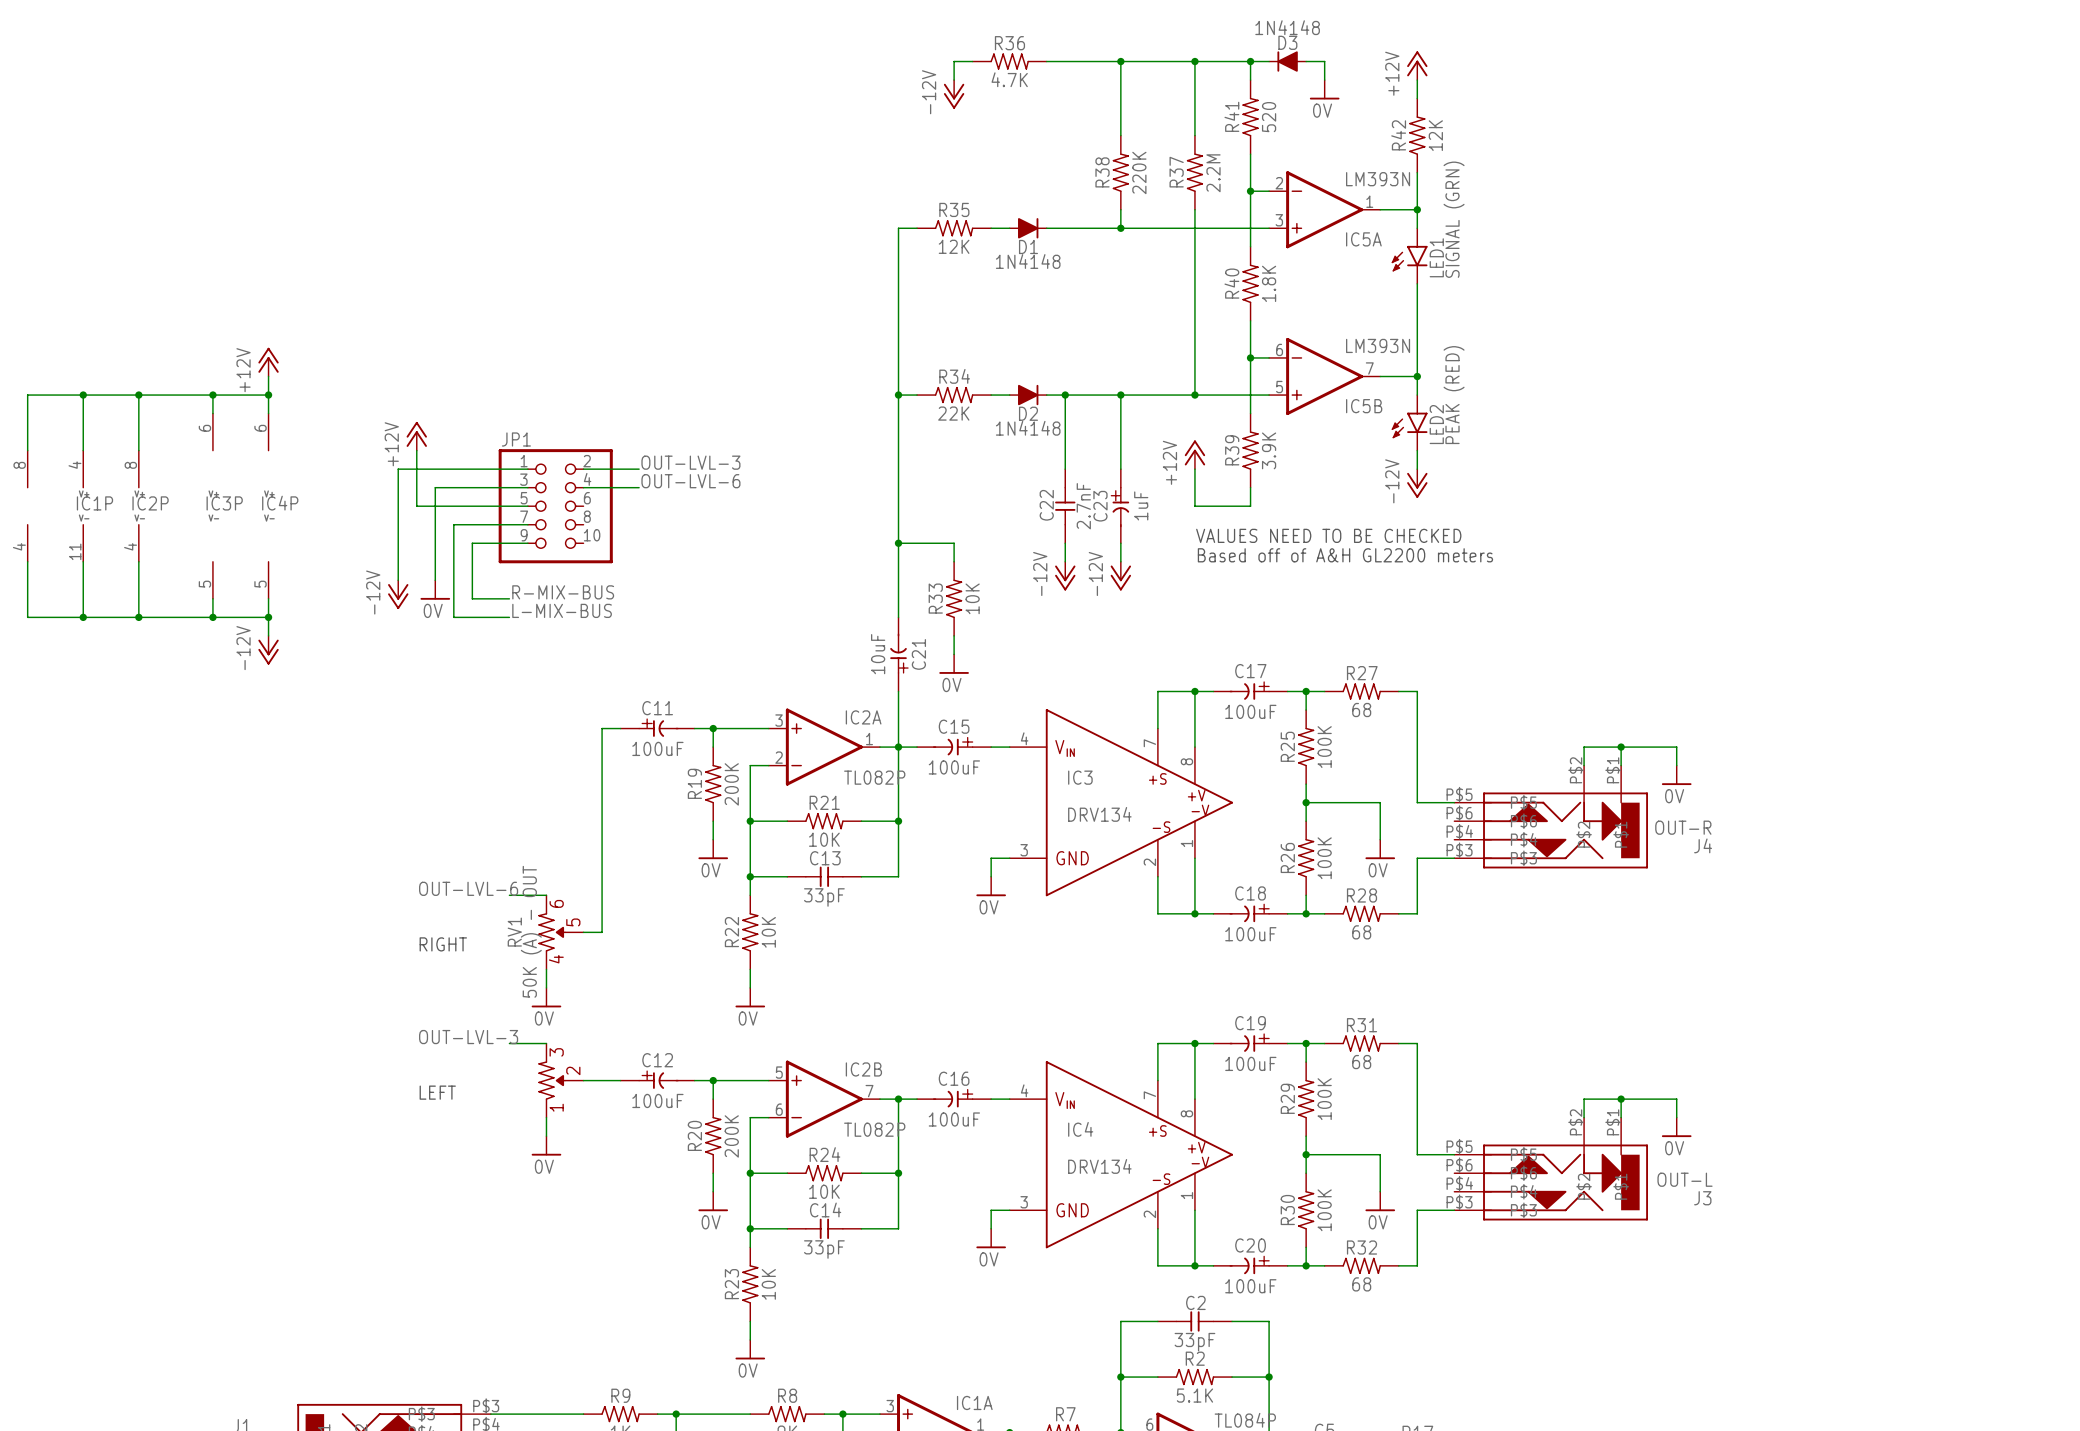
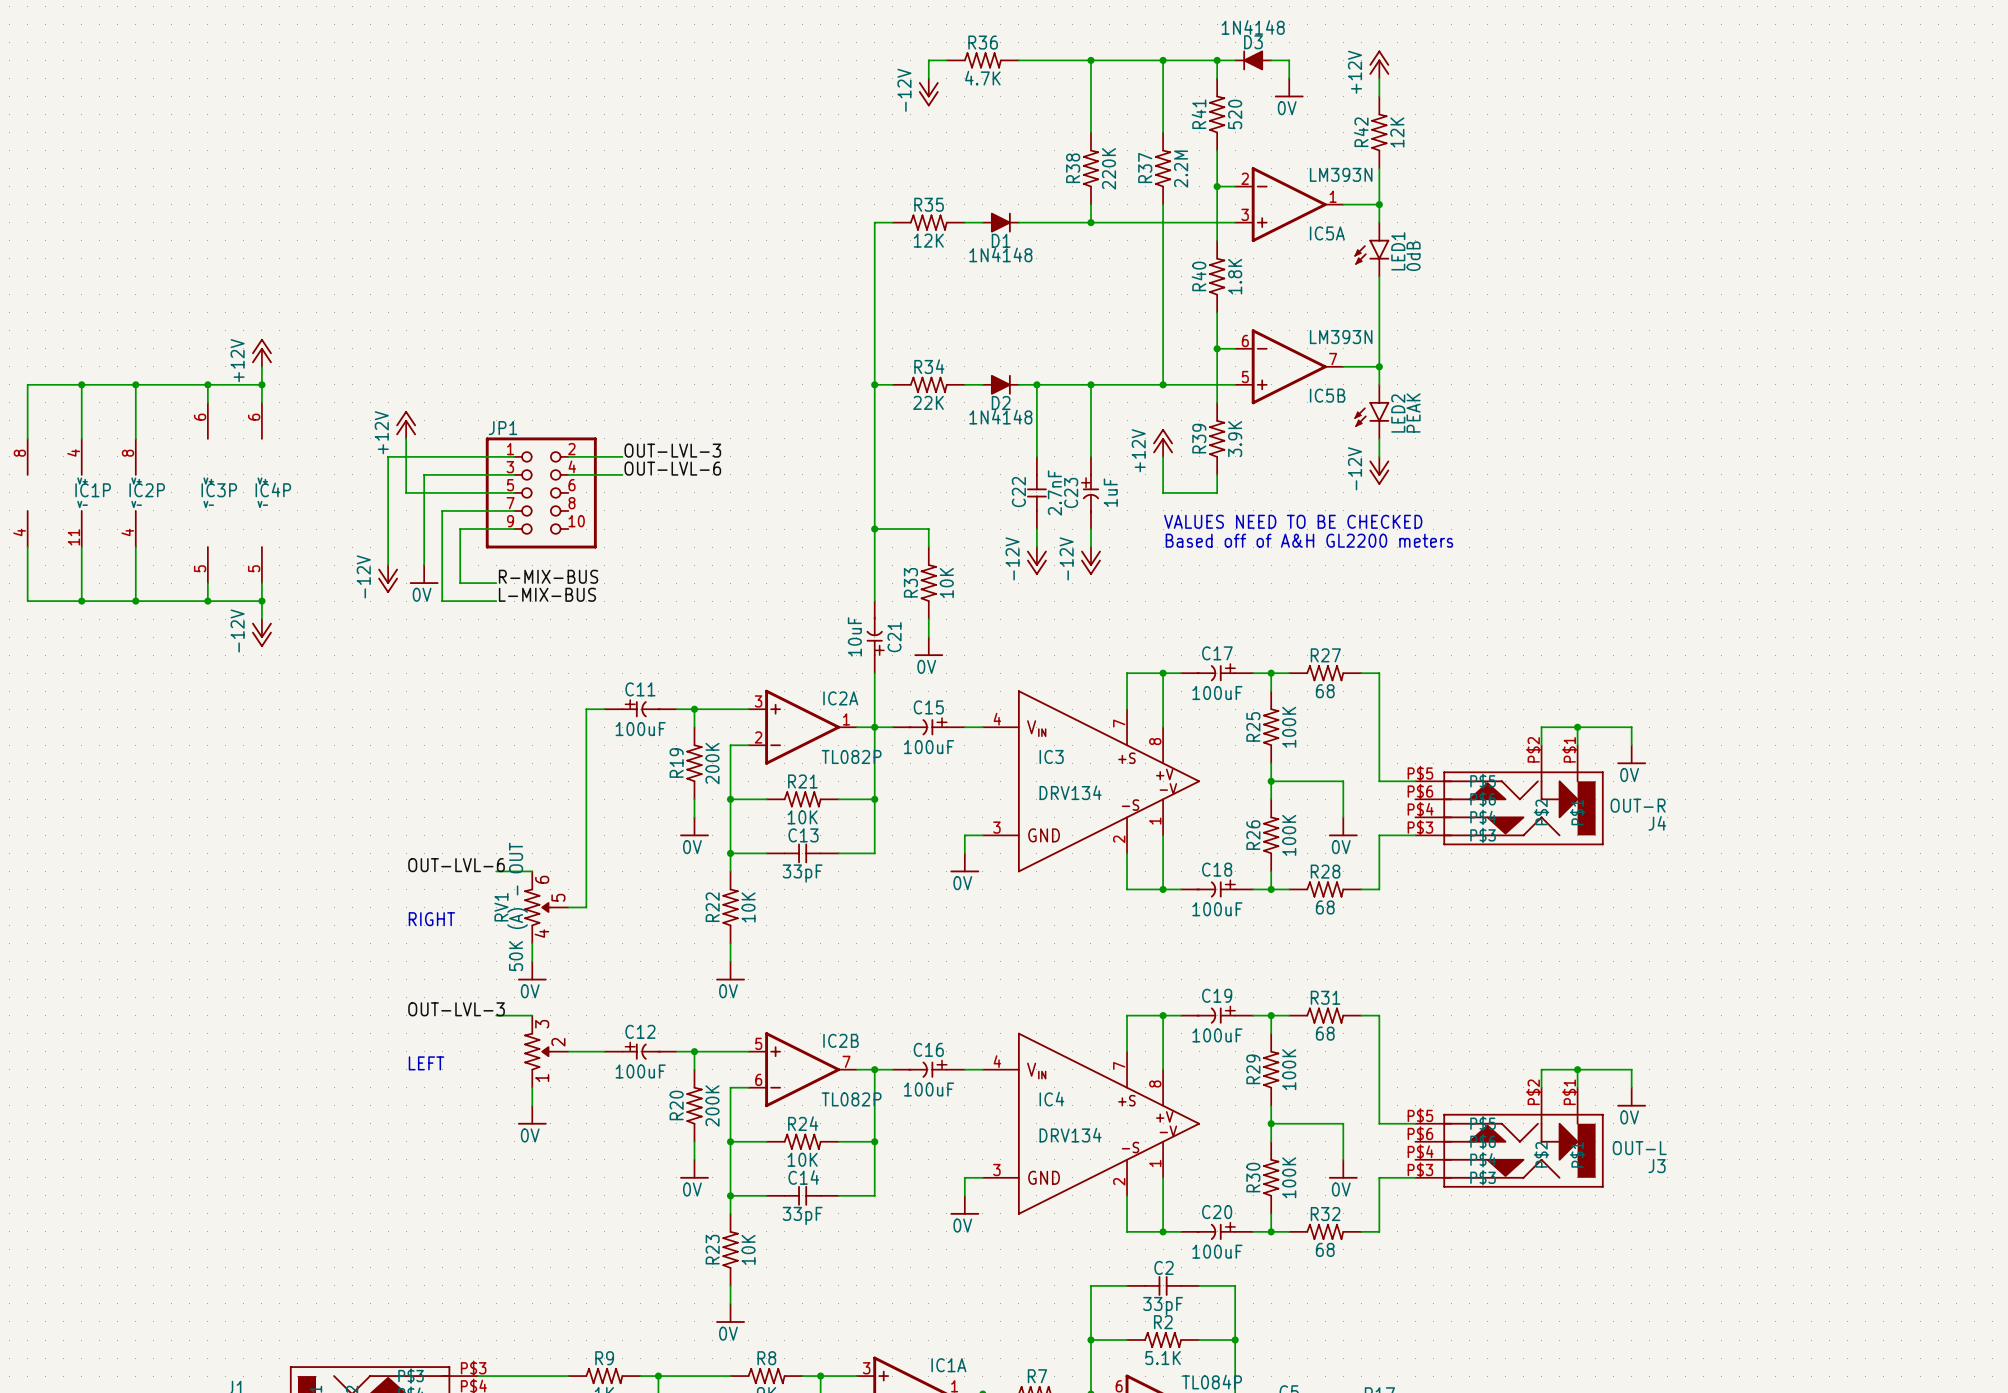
LED1 value: SIGNAL (GRN) (1454, 219) -> 0dB (1413, 256)
LED2 value: PEAK (RED) (1454, 395) -> PEAK (1413, 412)

